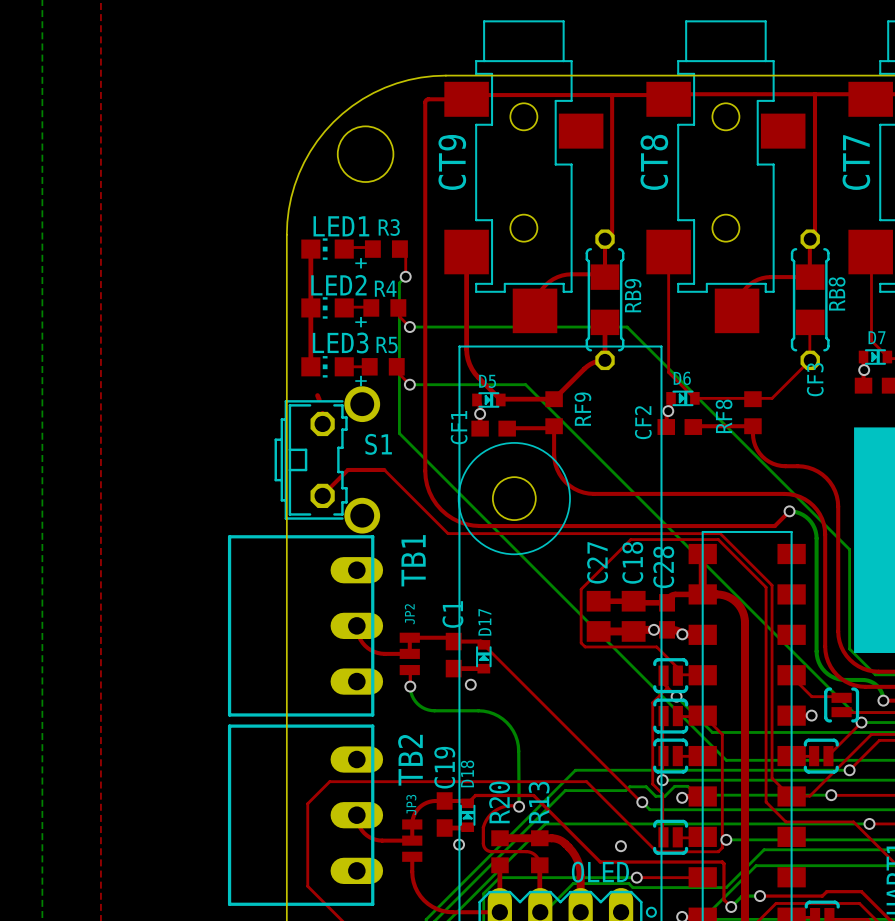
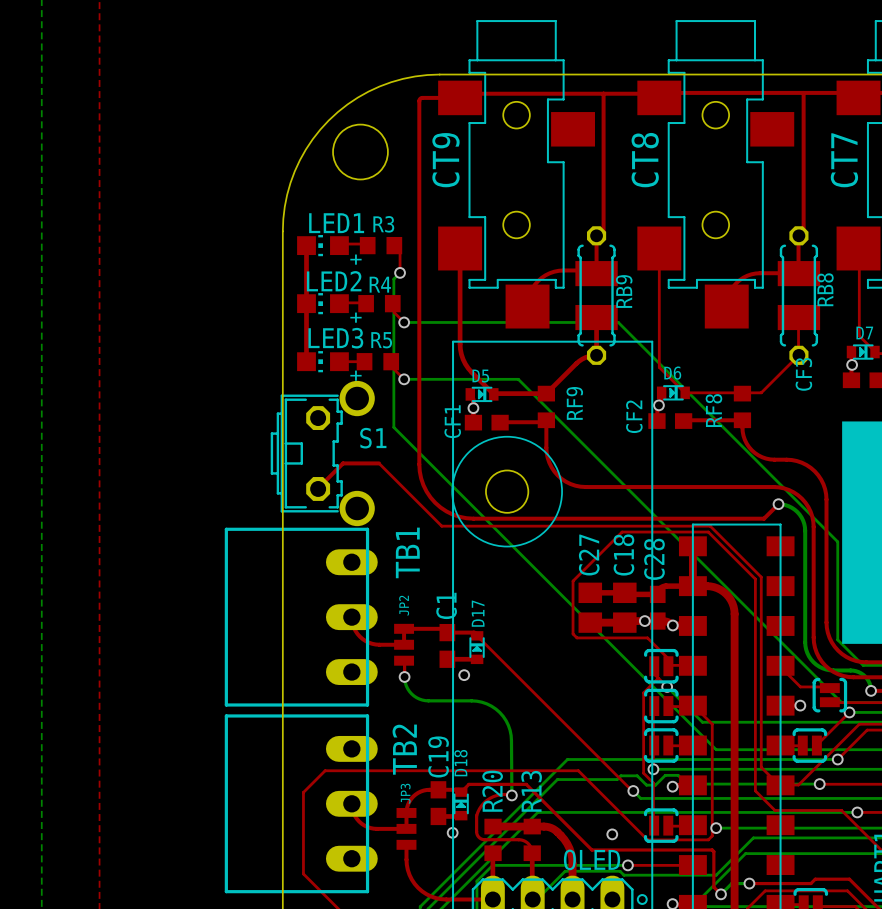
RB9 footprint: [590, 264, 620, 336] -> [575, 261, 618, 331]
RB8 footprint: [795, 264, 825, 336] -> [777, 261, 821, 331]
top track: (317, 395) (319, 399) -> none

